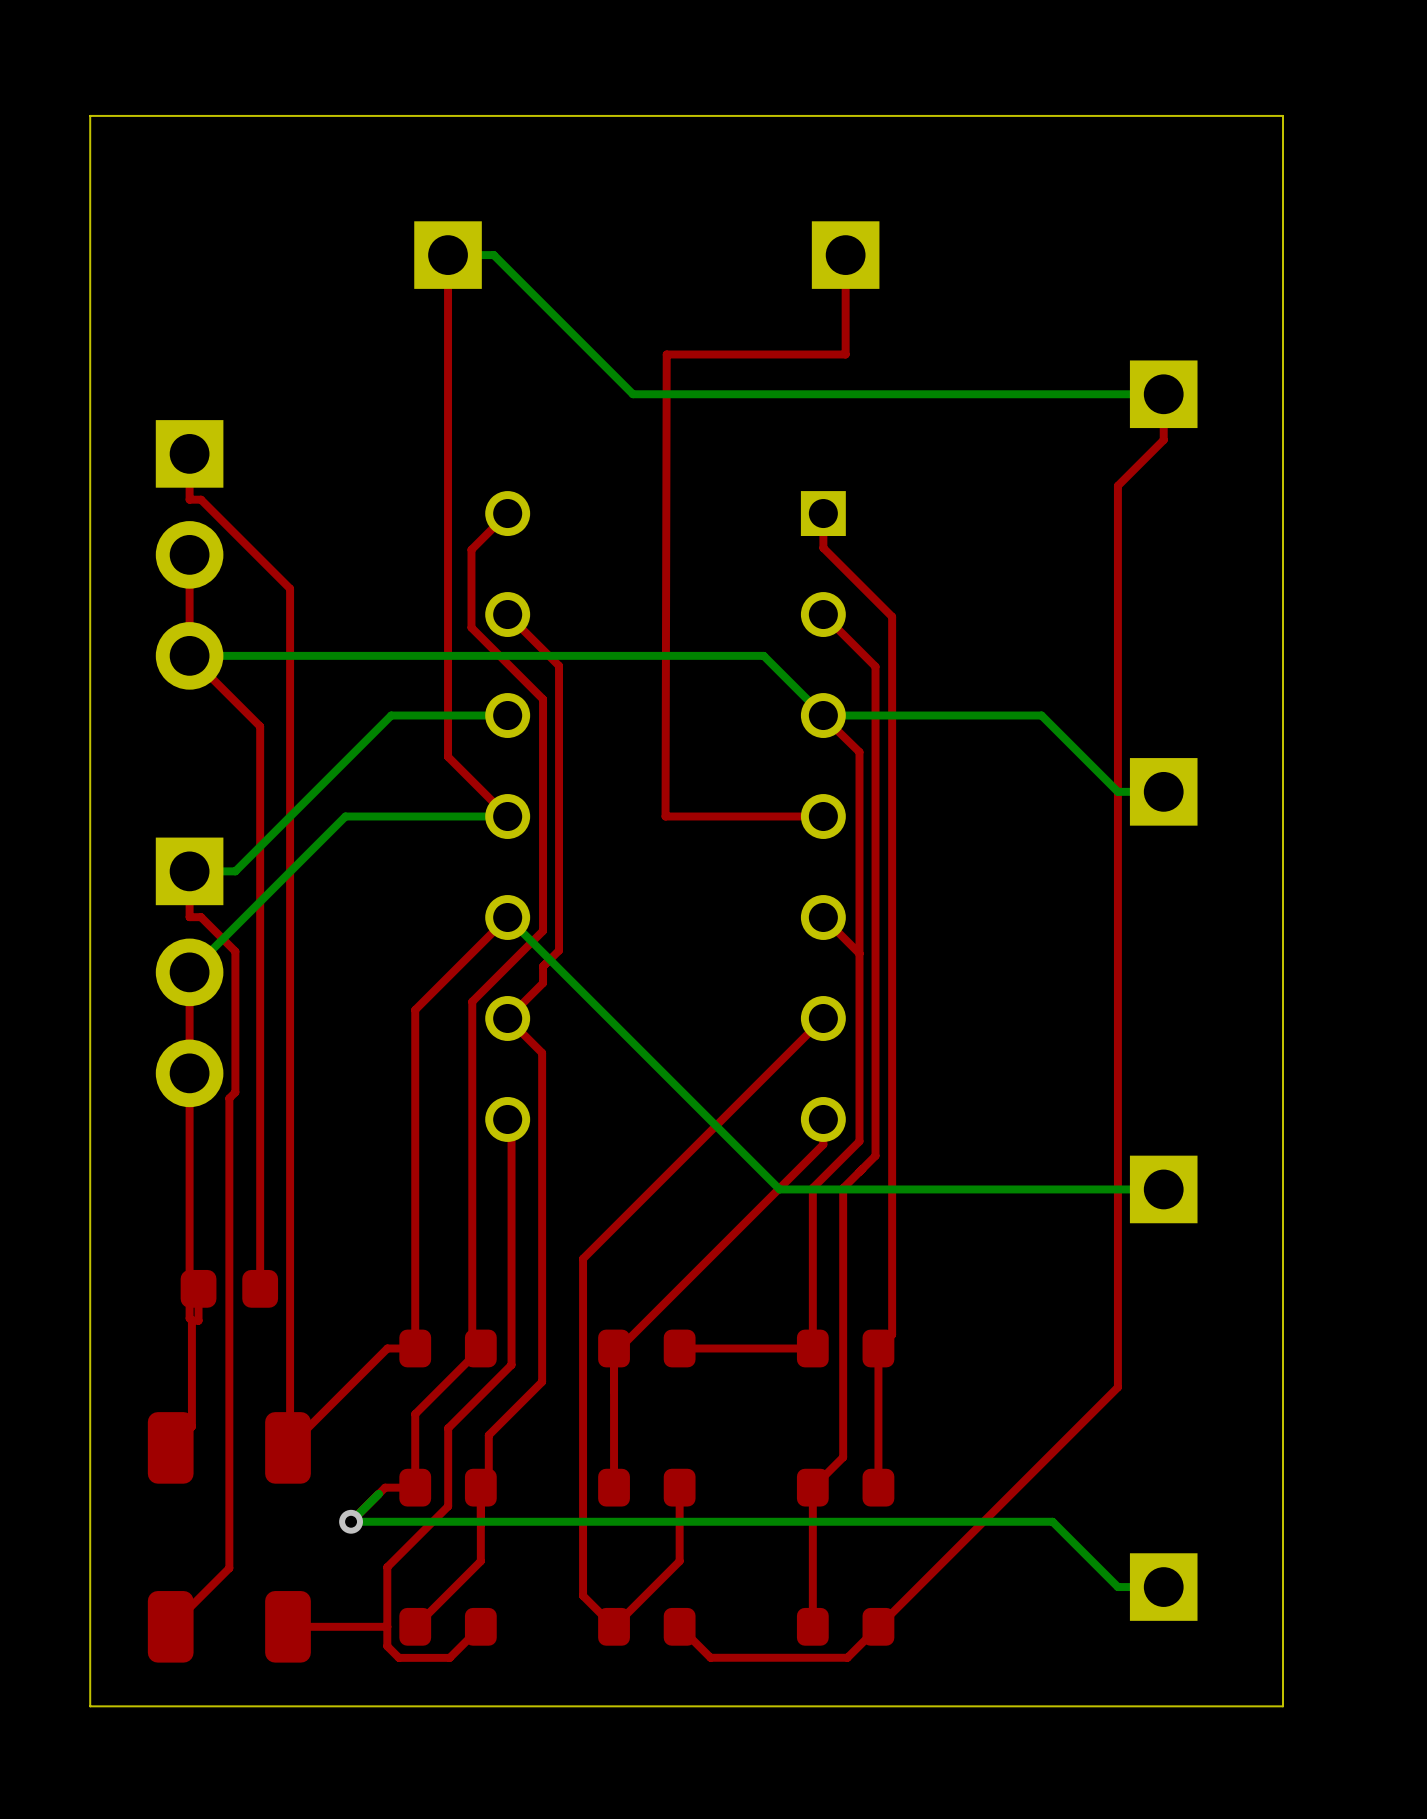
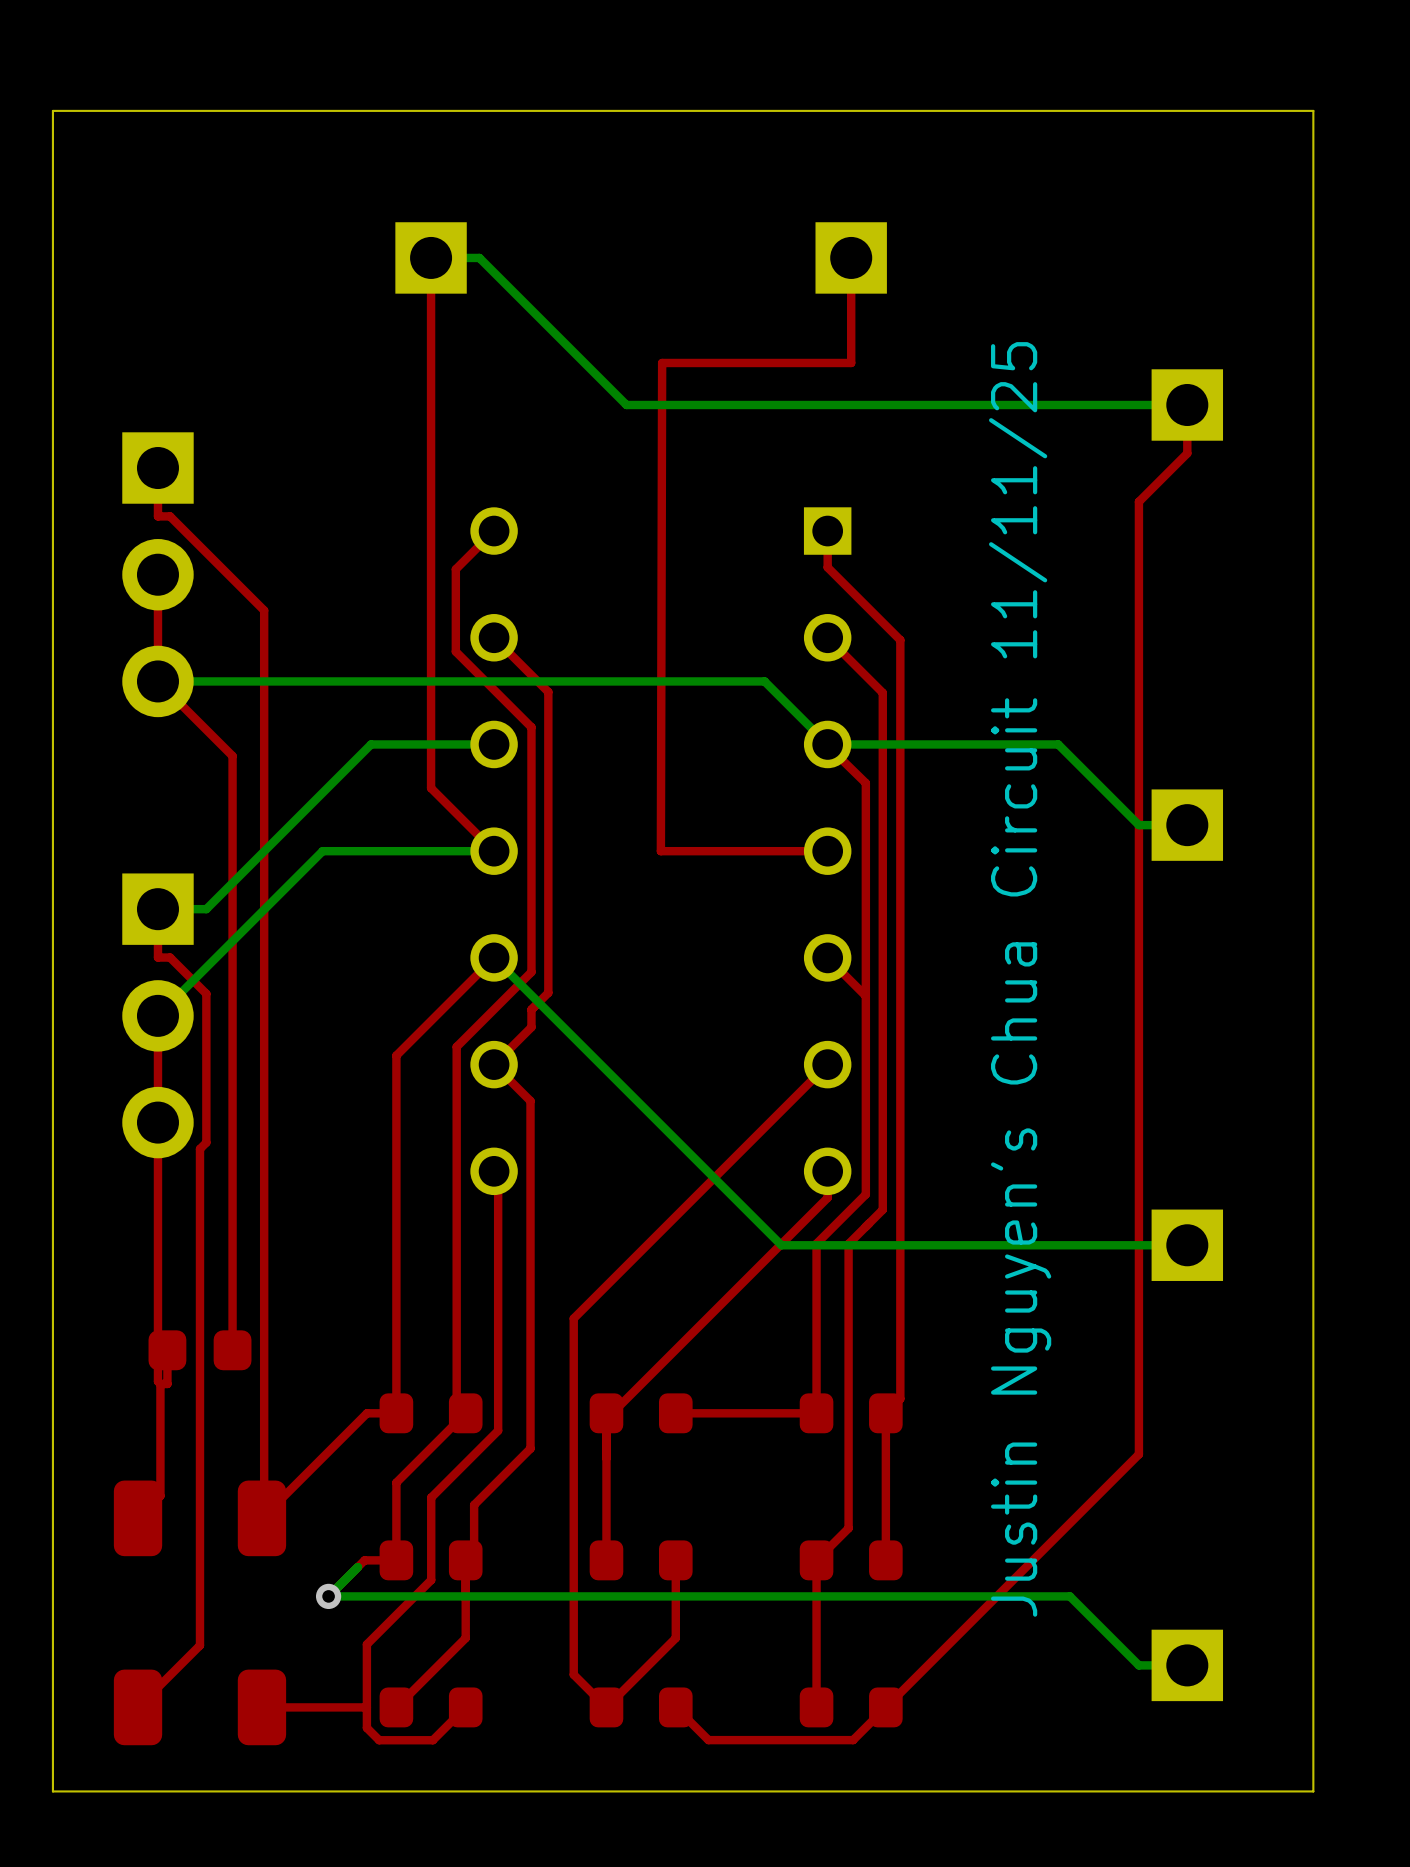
text: none -> Justin Nguyen's Chua Circuit 11/11/25 (1020, 979)

